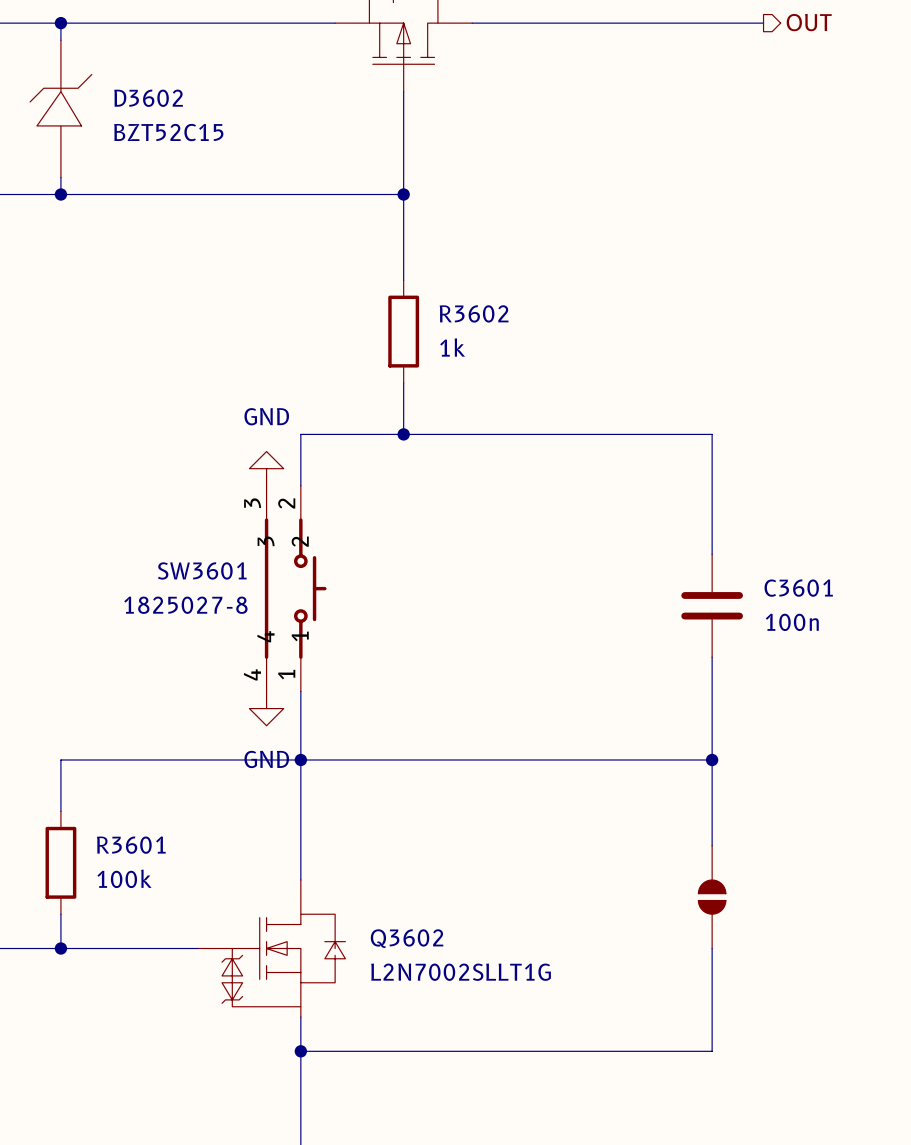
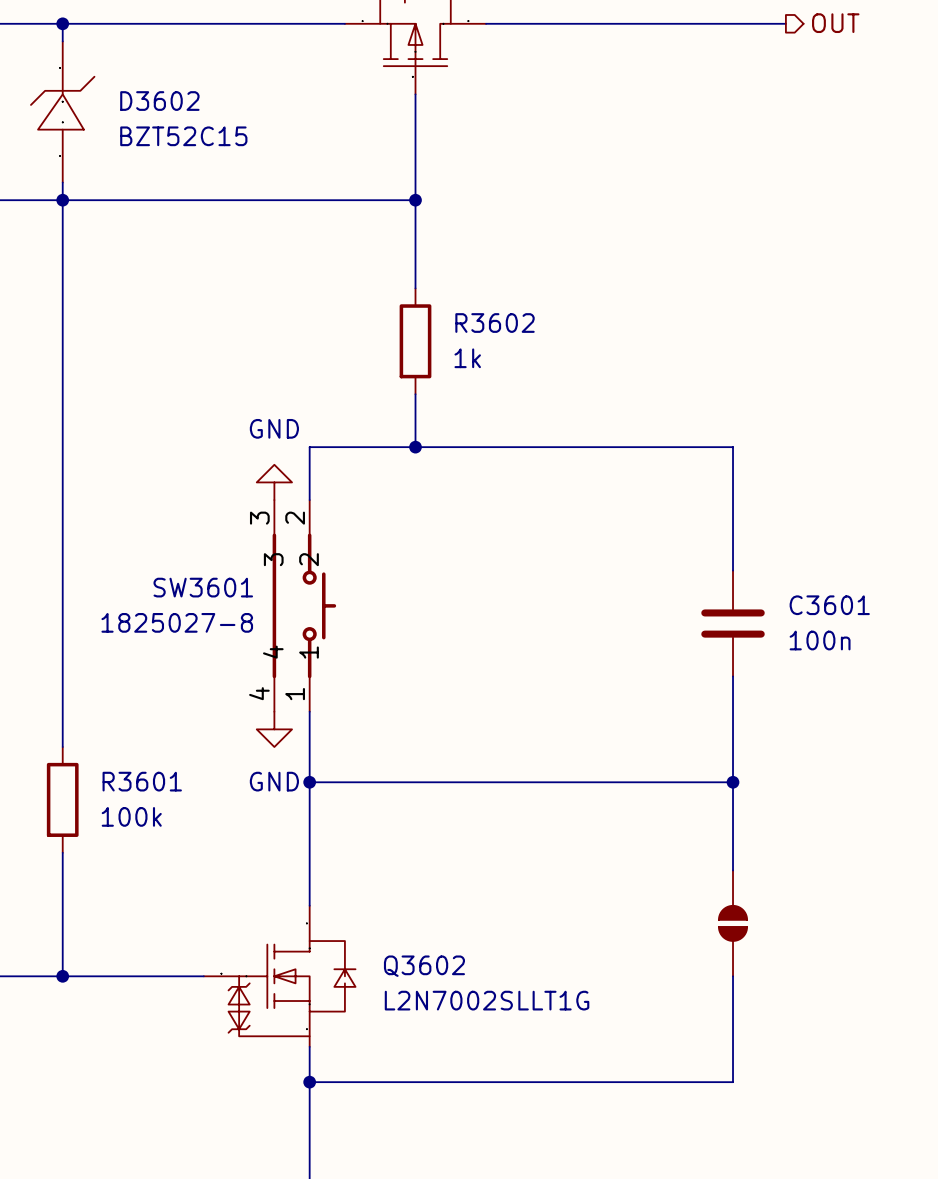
wire: none -> (62, 200) (62, 747)
wire: (300, 760) (60, 760) (60, 811) -> none
wire: none -> (62, 852) (62, 941)
R3601 position: (60, 862) -> (62, 799)

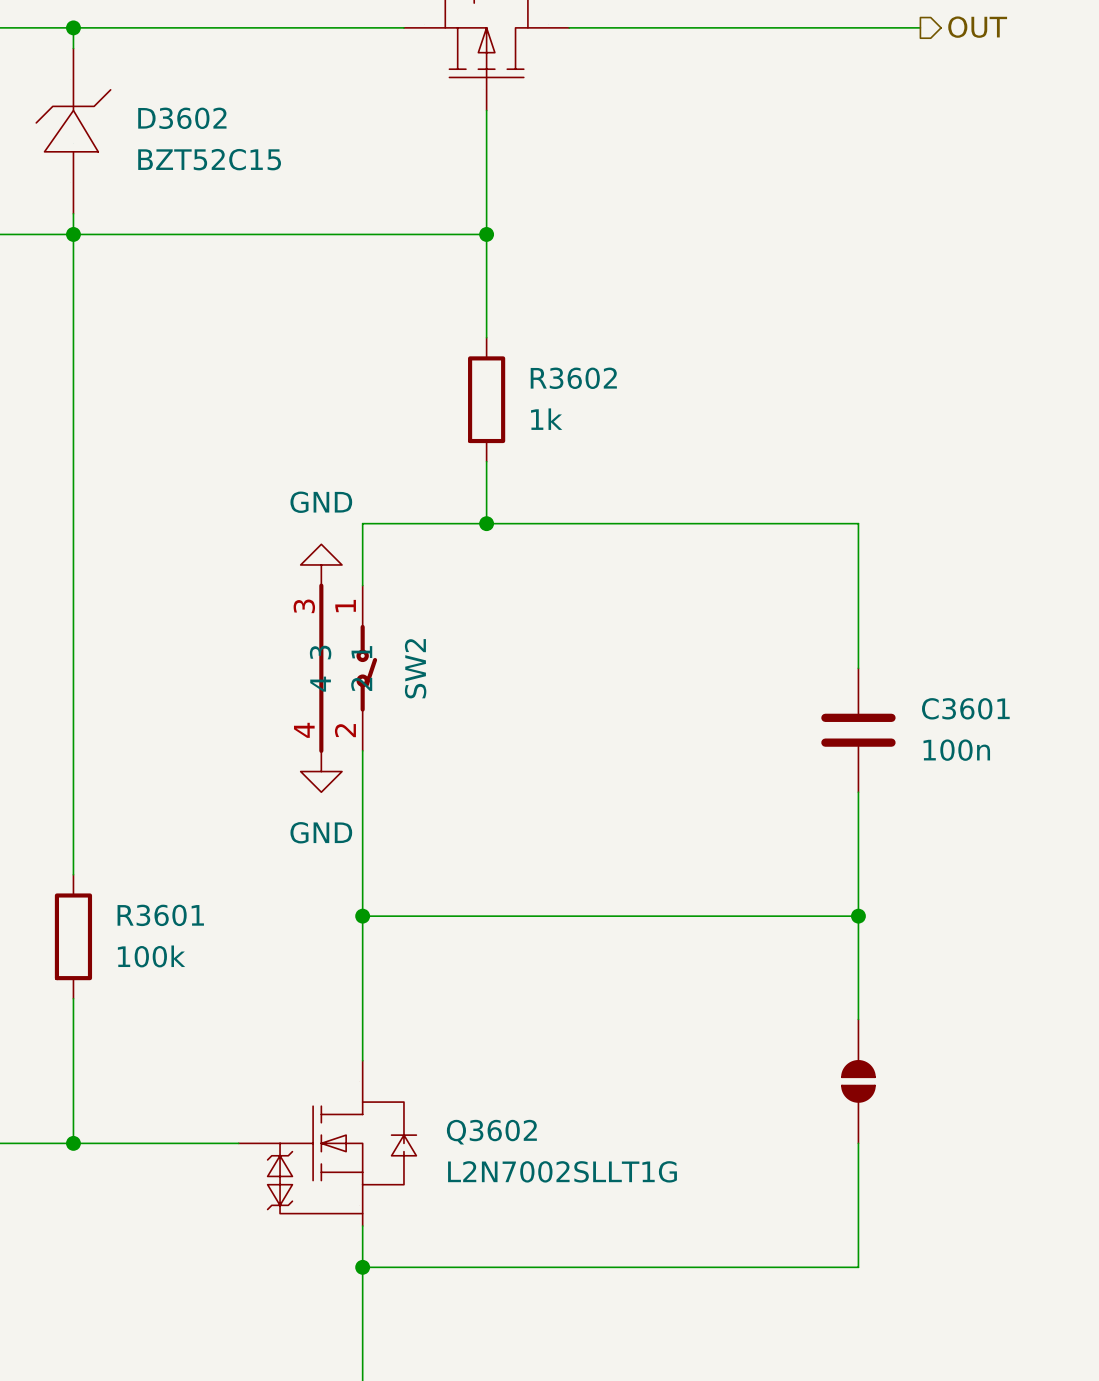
SW2: none -> (348, 668)
SW3601: 1825027-8 (304, 605) -> none
power symbol position: GND (274, 729) -> GND (321, 771)

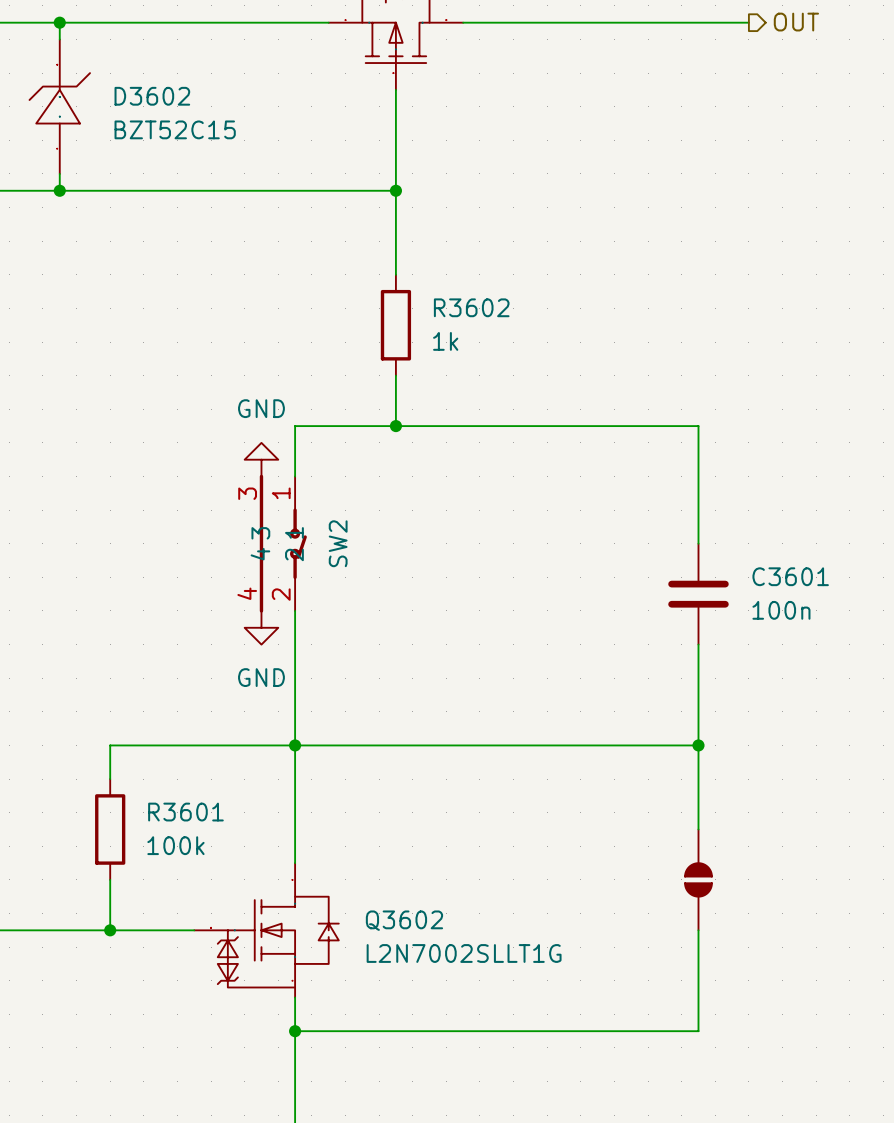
wire: (73, 234) (73, 874) -> none
wire: none -> (295, 745) (110, 745) (110, 779)
R3601 position: (73, 936) -> (110, 829)
wire: (73, 998) (73, 1143) -> none
wire: none -> (110, 879) (110, 930)
junction position: (73, 1143) -> (110, 930)

